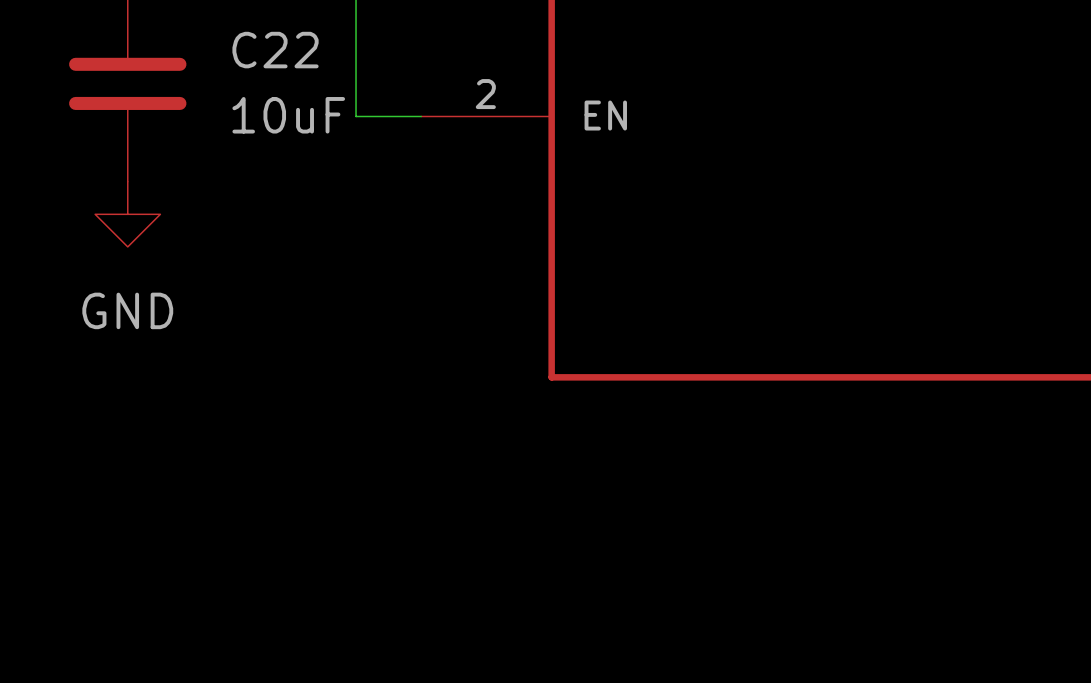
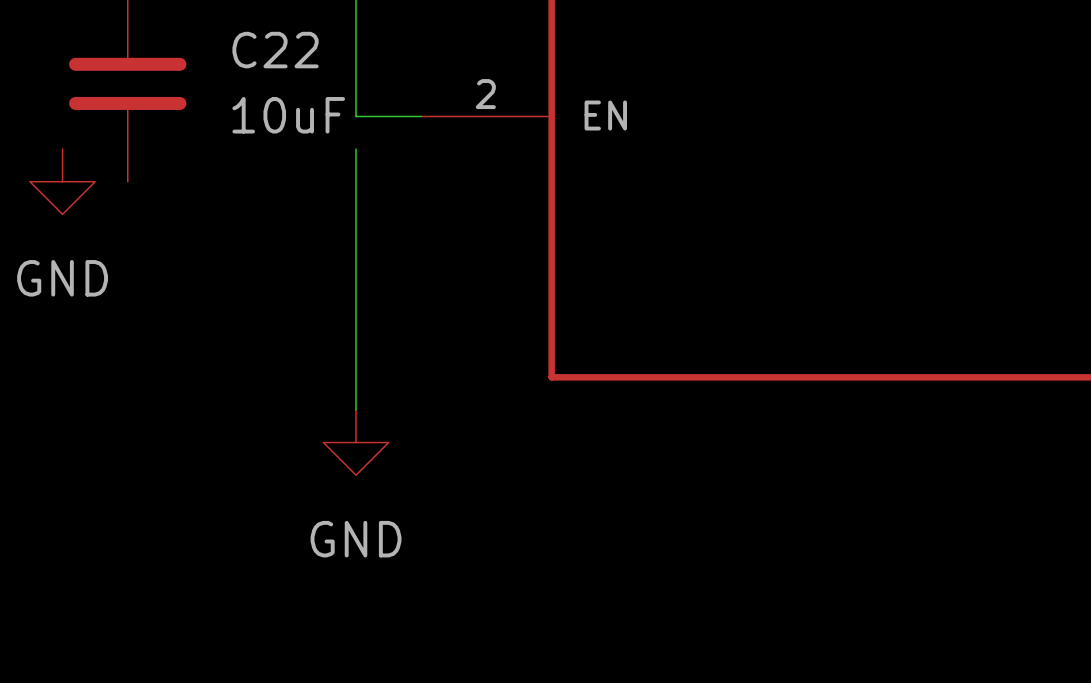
wire: none -> (356, 149) (356, 409)
power symbol position: GND (127, 214) -> GND (62, 181)
power symbol: none -> GND (356, 442)

